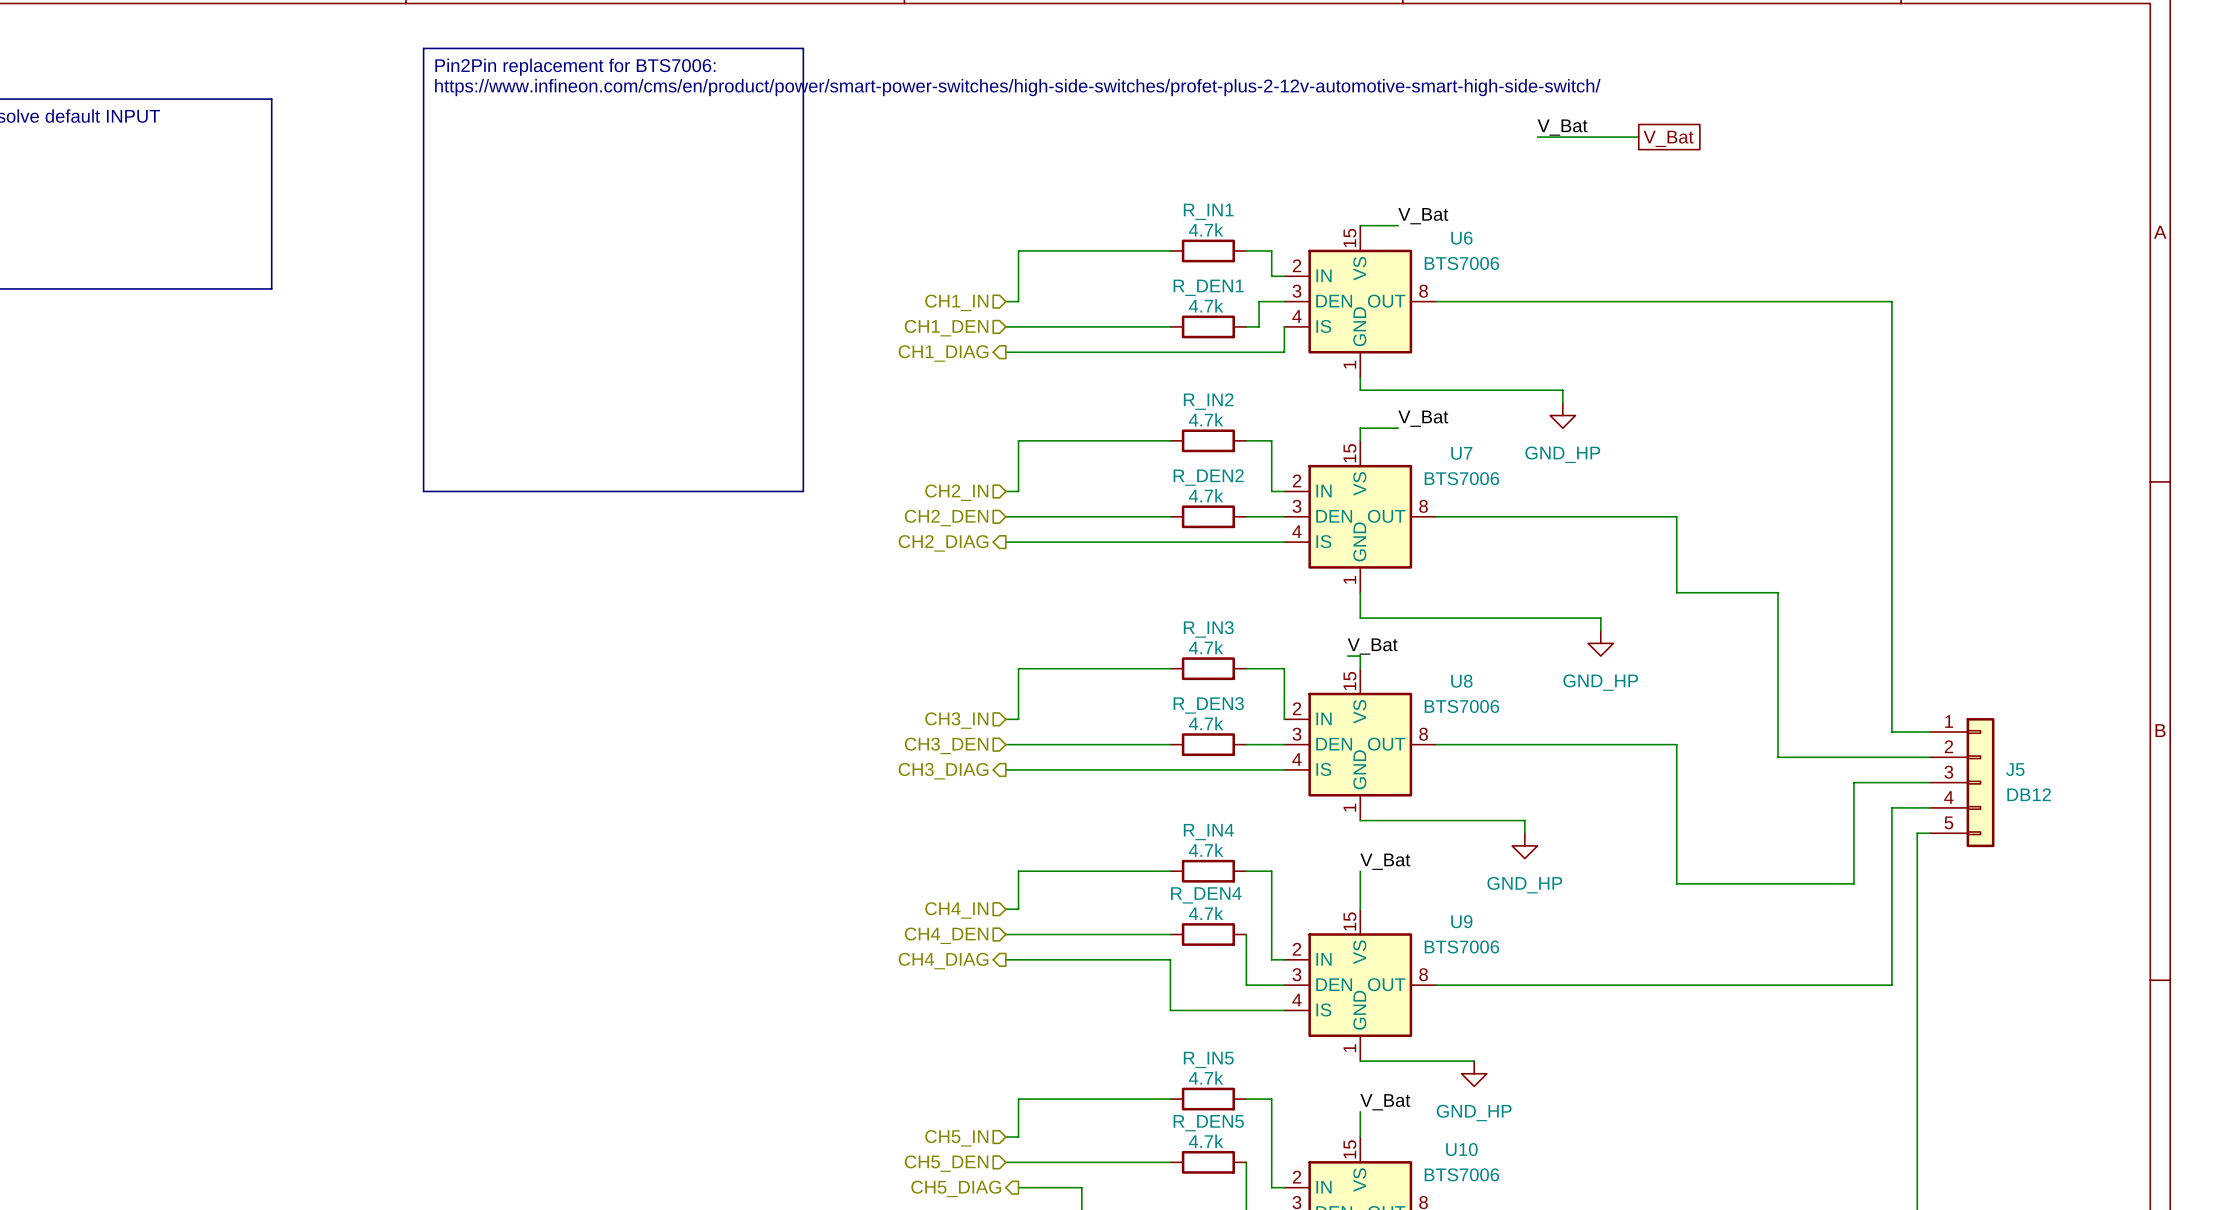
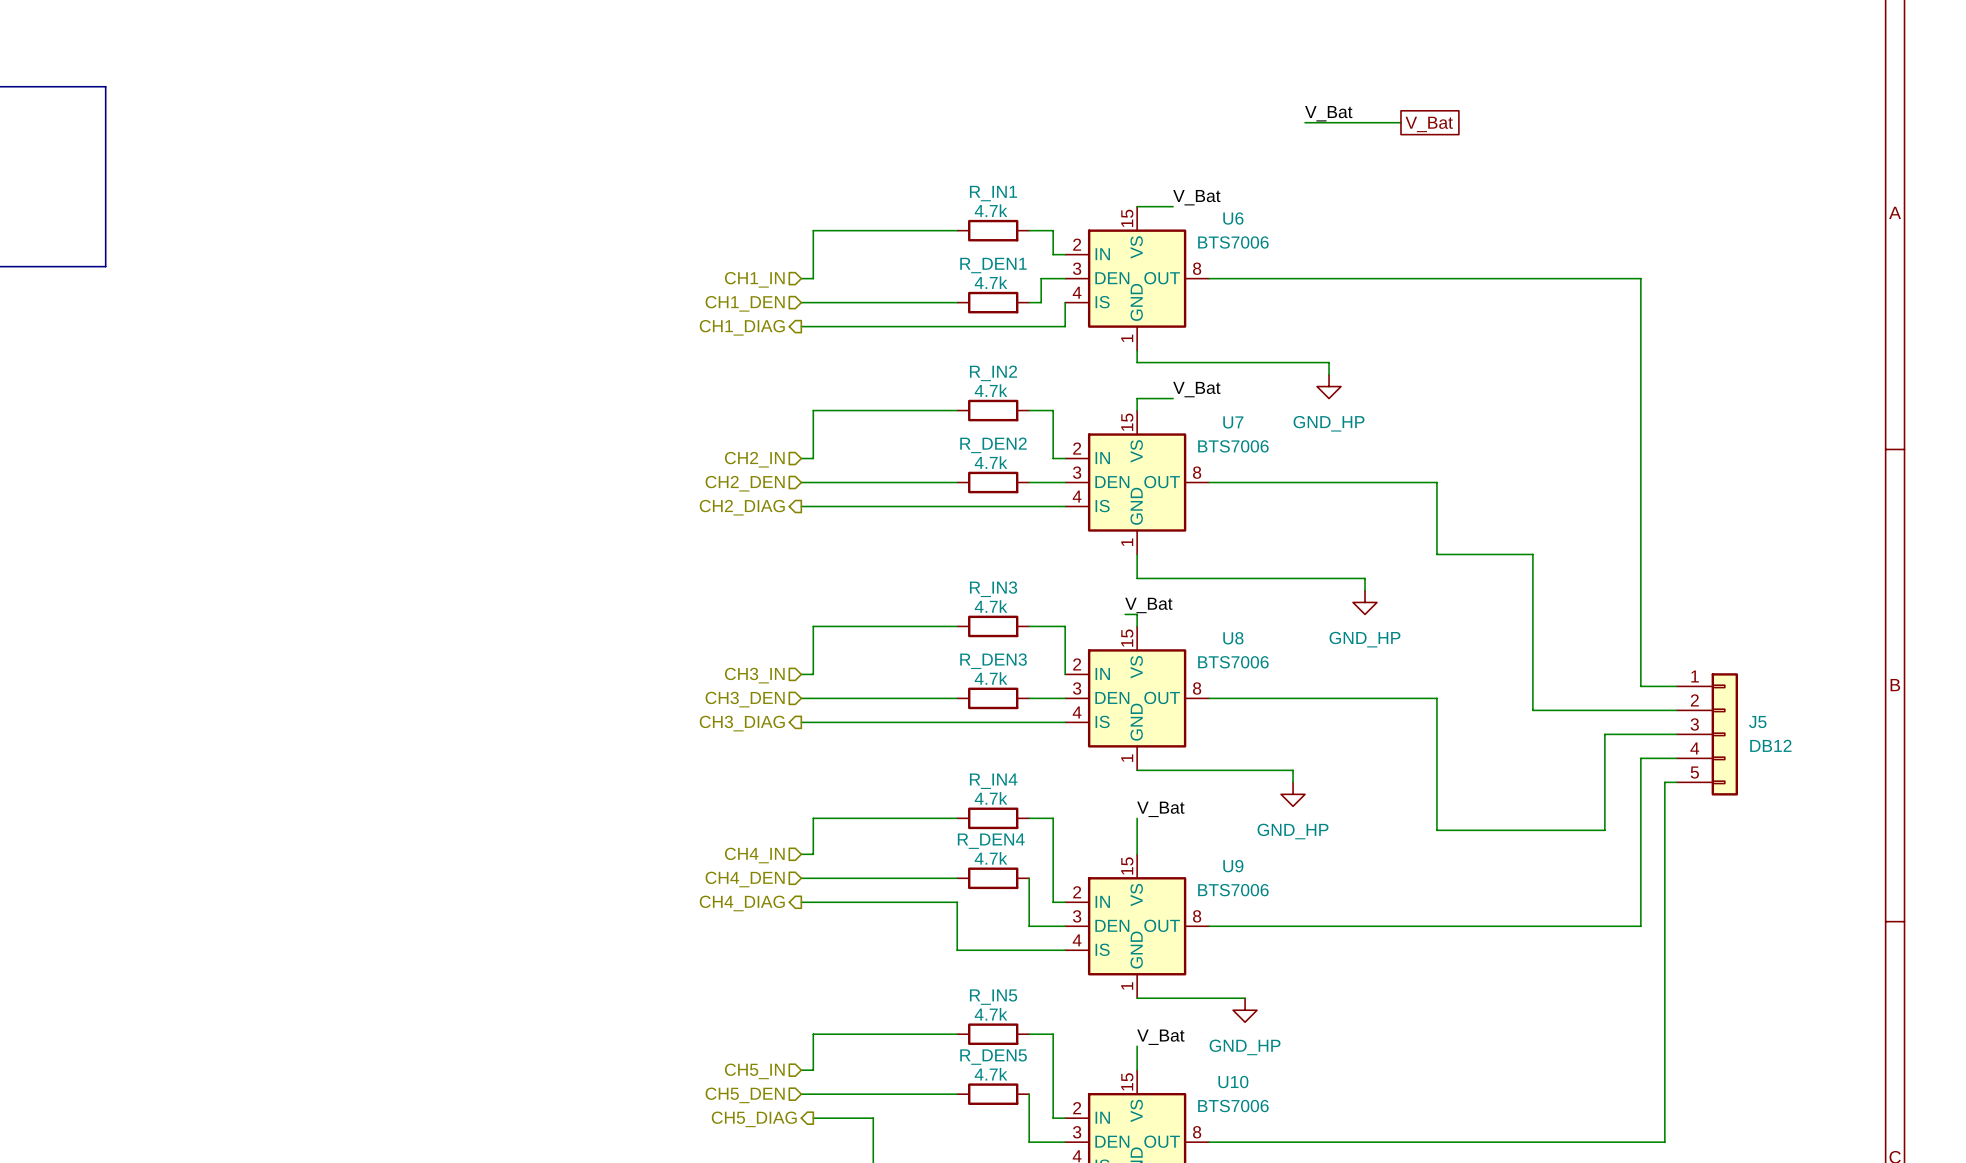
line: (423, 48) (803, 48) (803, 491) (423, 491) (423, 48) -> none
text: Pin2Pin replacement for BTS7006: (575, 67) -> none
text: https://www.infineon.com/cms/en/product/power/smart-power-switches/high-side-switches/profet-plus-2-12v-automotive-smart-high-side-switch/ (1017, 87) -> none

